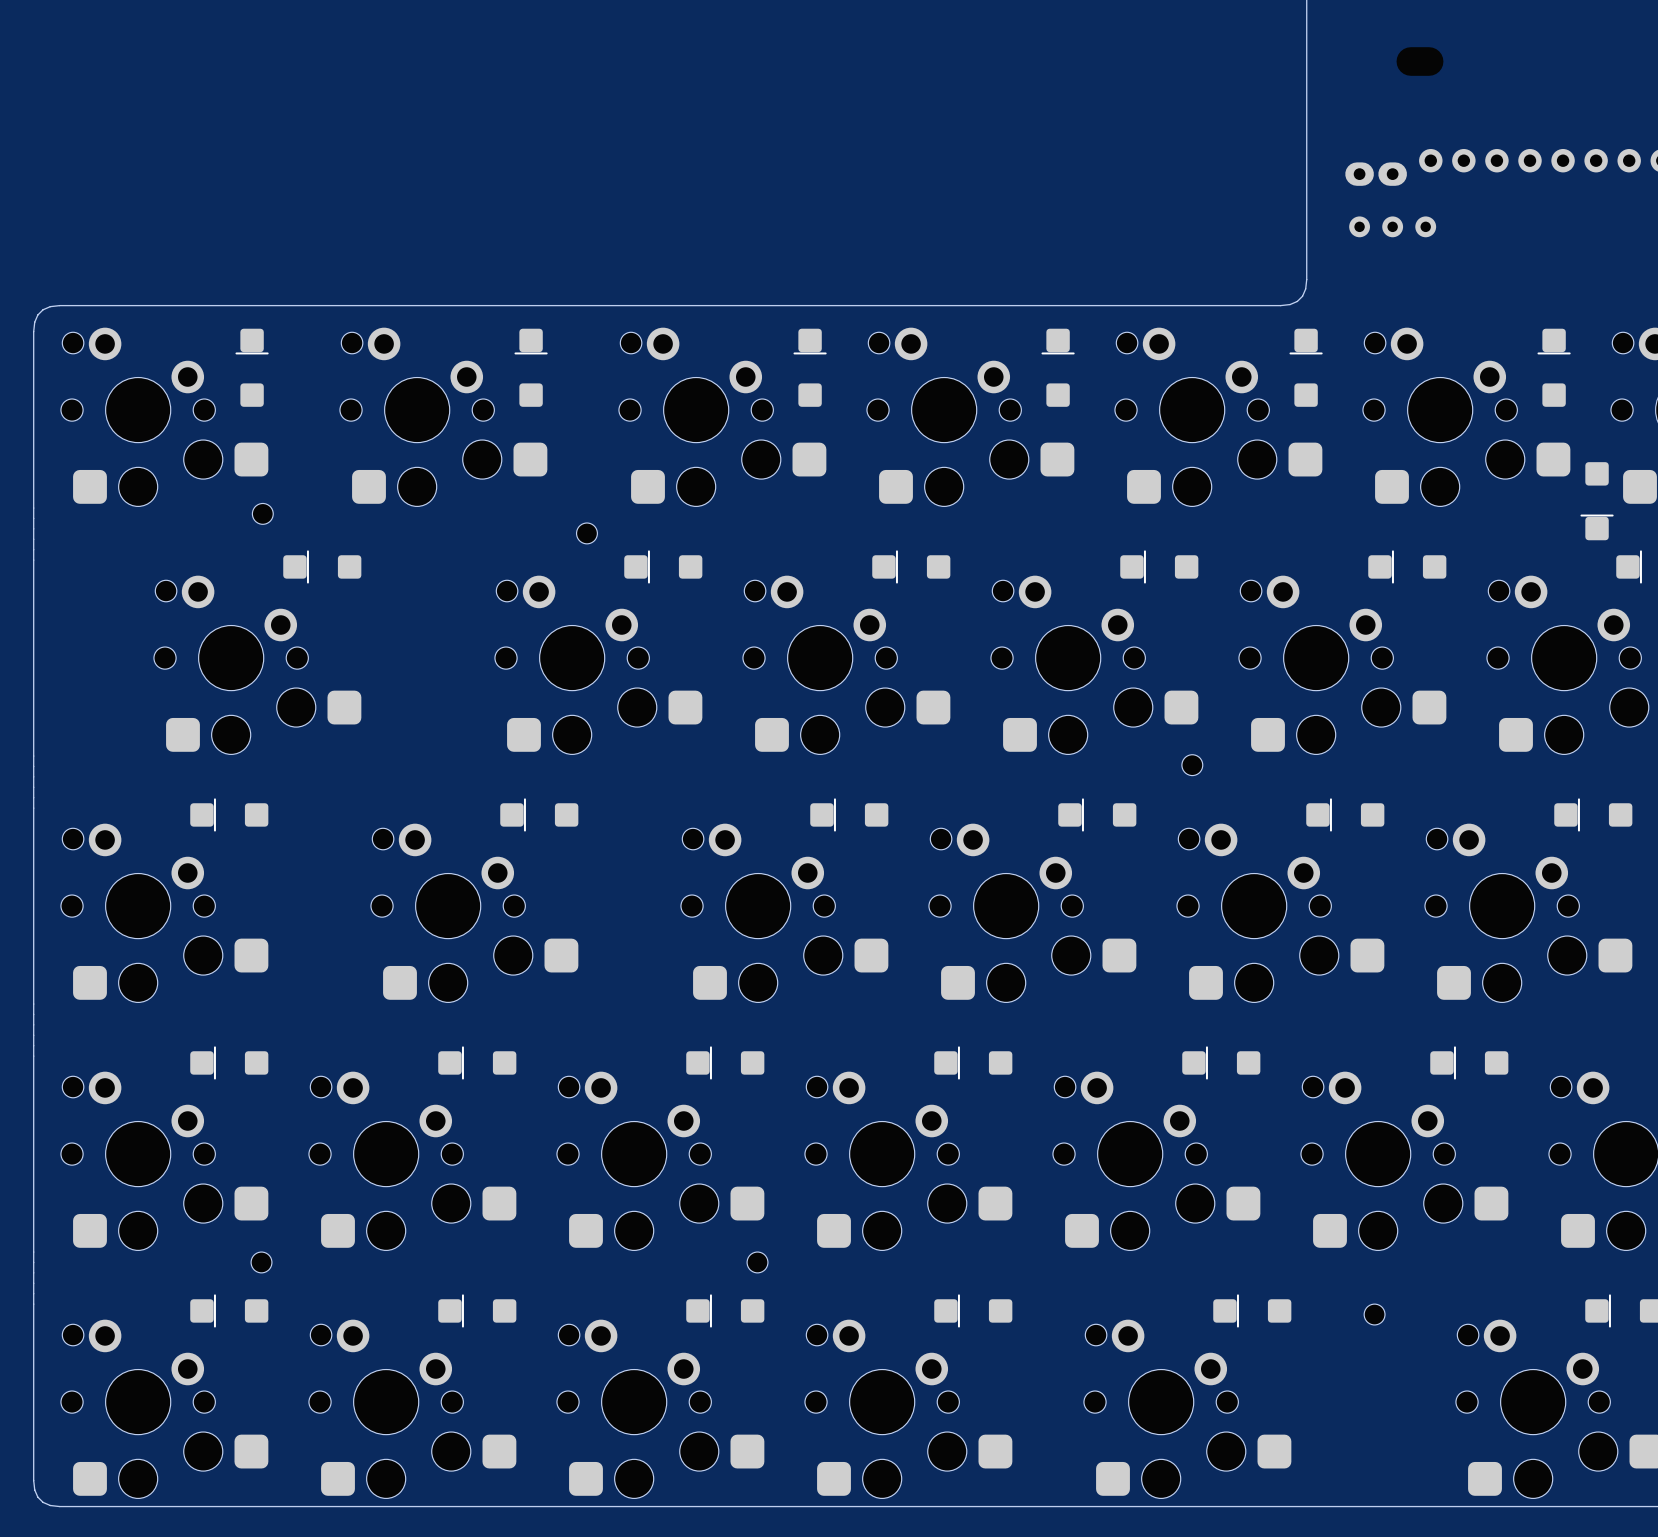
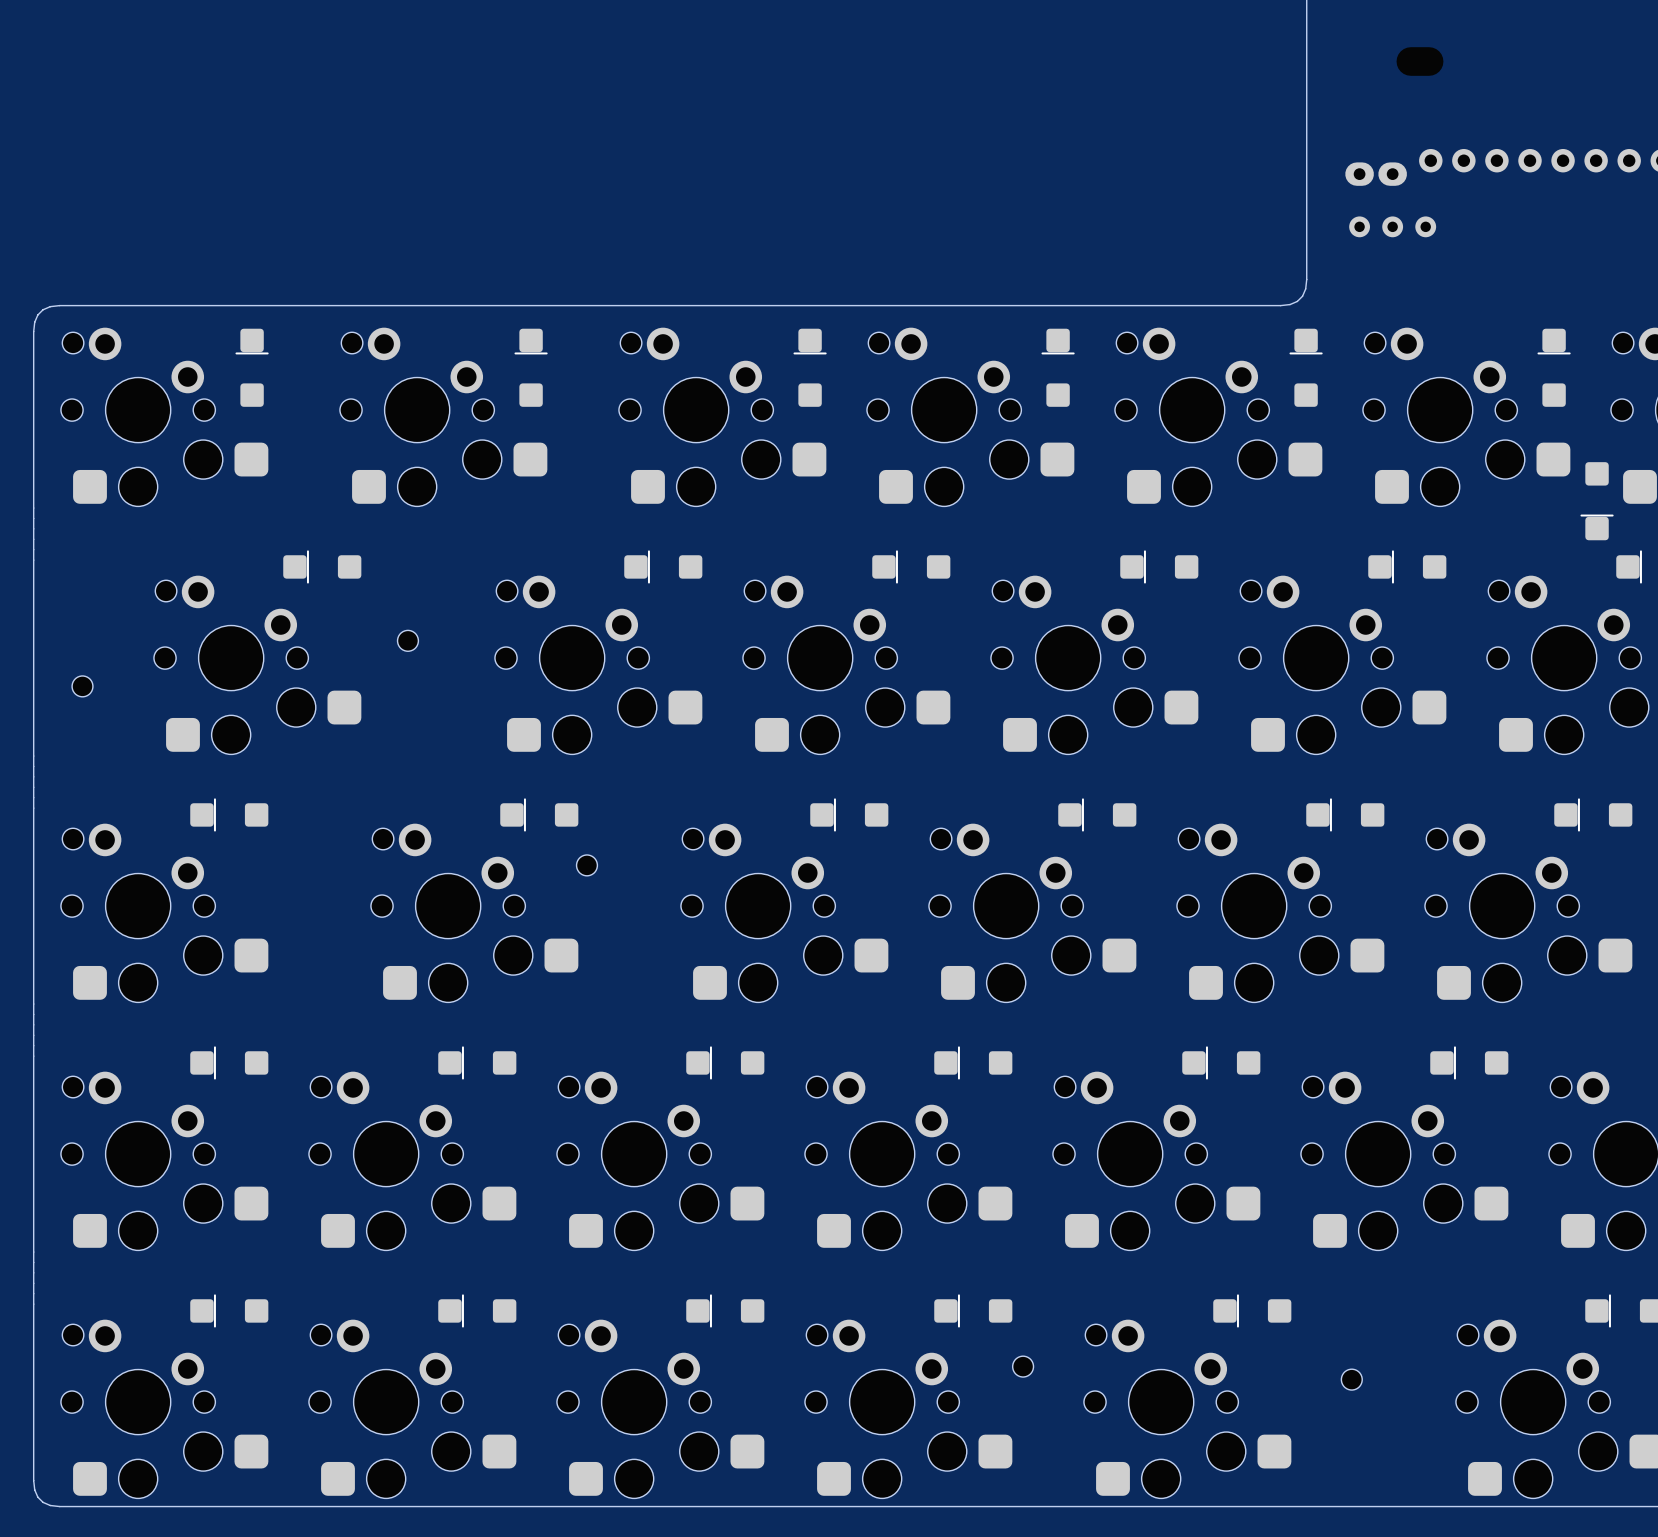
part: (262, 513) -> none
part: (586, 533) -> none
part: none -> (407, 640)
part: none -> (82, 686)
part: (1192, 765) -> none
part: none -> (586, 865)
part: (261, 1262) -> none
part: (757, 1262) -> none
part position: (1374, 1314) -> (1351, 1379)
part: none -> (1023, 1366)

